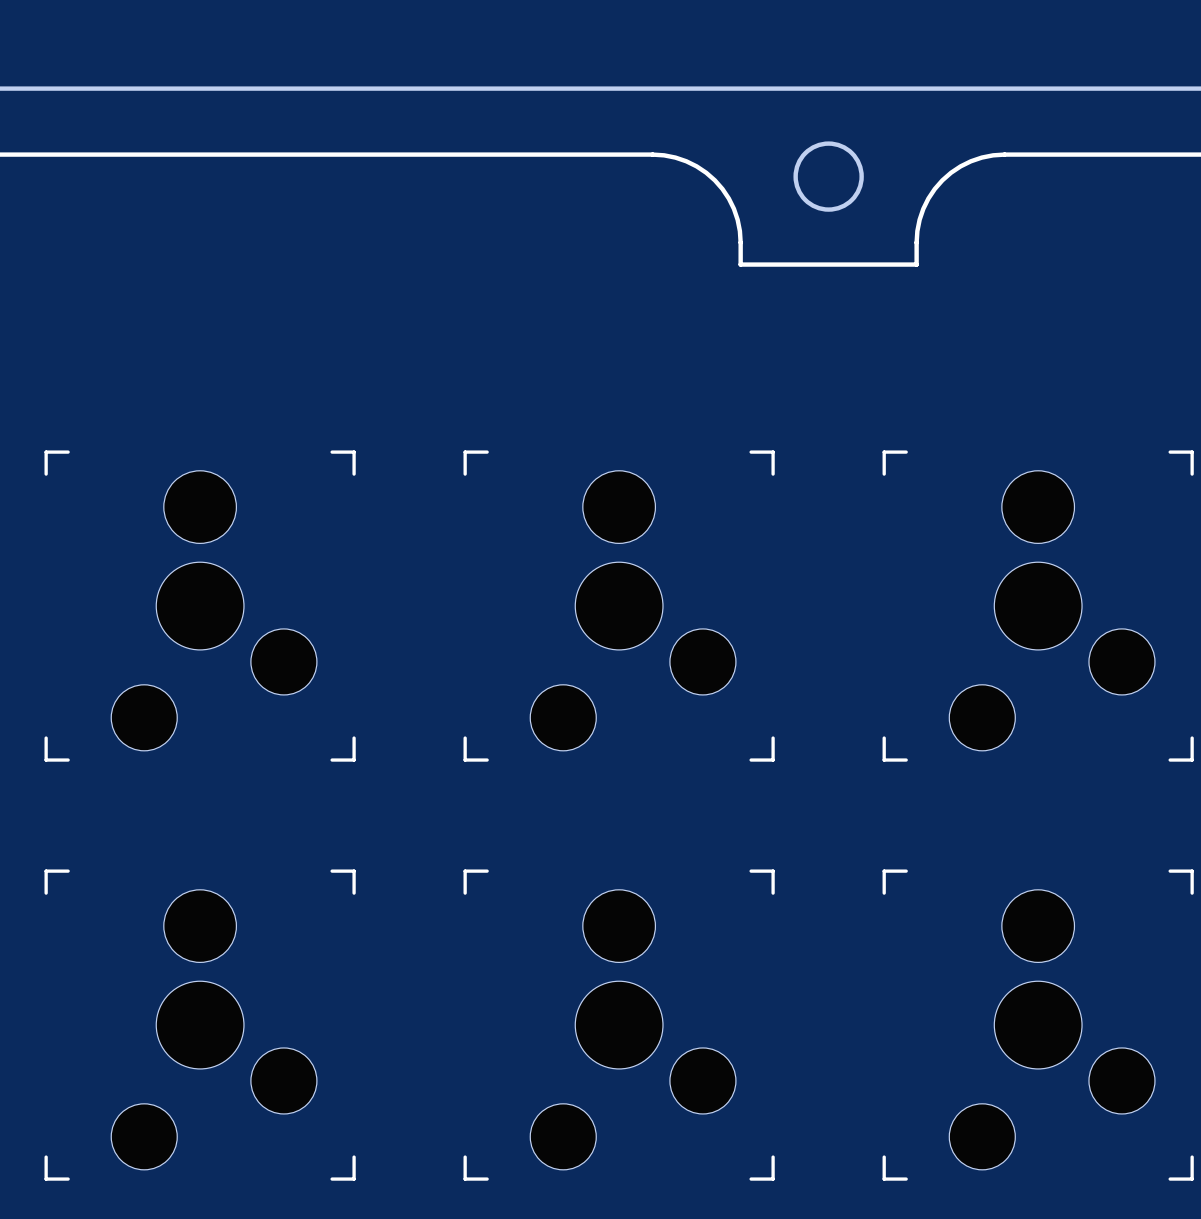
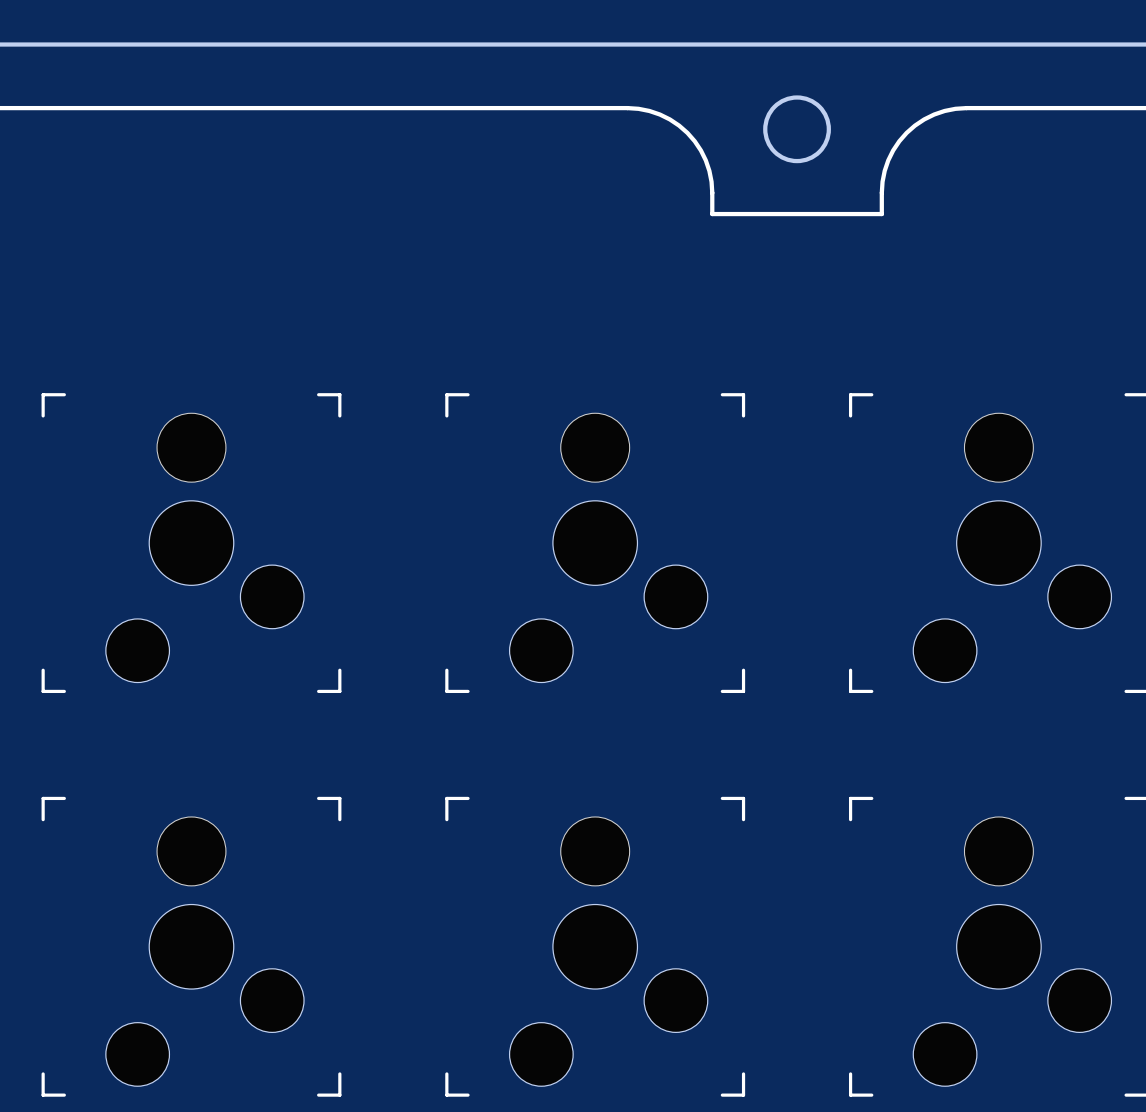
part footprint: [163, 470, 237, 544] -> [156, 412, 227, 483]
part footprint: [582, 470, 656, 544] -> [560, 412, 631, 483]
part footprint: [1001, 470, 1075, 544] -> [963, 412, 1034, 483]
part footprint: [163, 889, 237, 963] -> [156, 816, 227, 887]
part footprint: [582, 889, 656, 963] -> [560, 816, 631, 887]
part footprint: [1001, 889, 1075, 963] -> [963, 816, 1034, 887]

